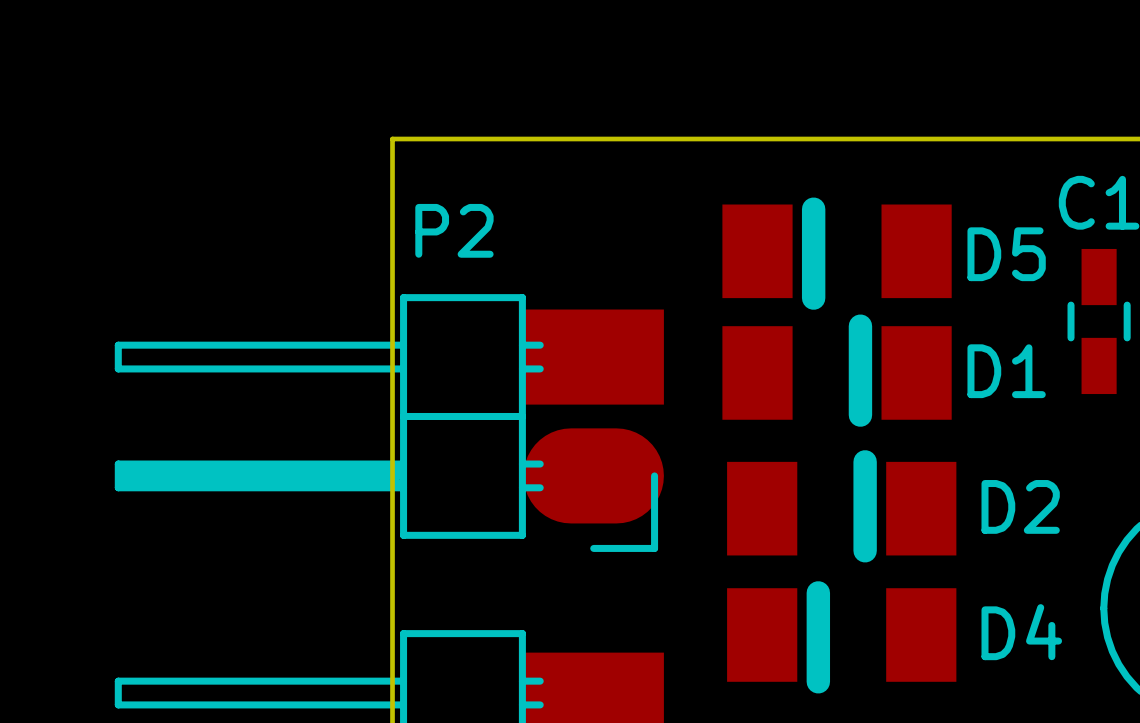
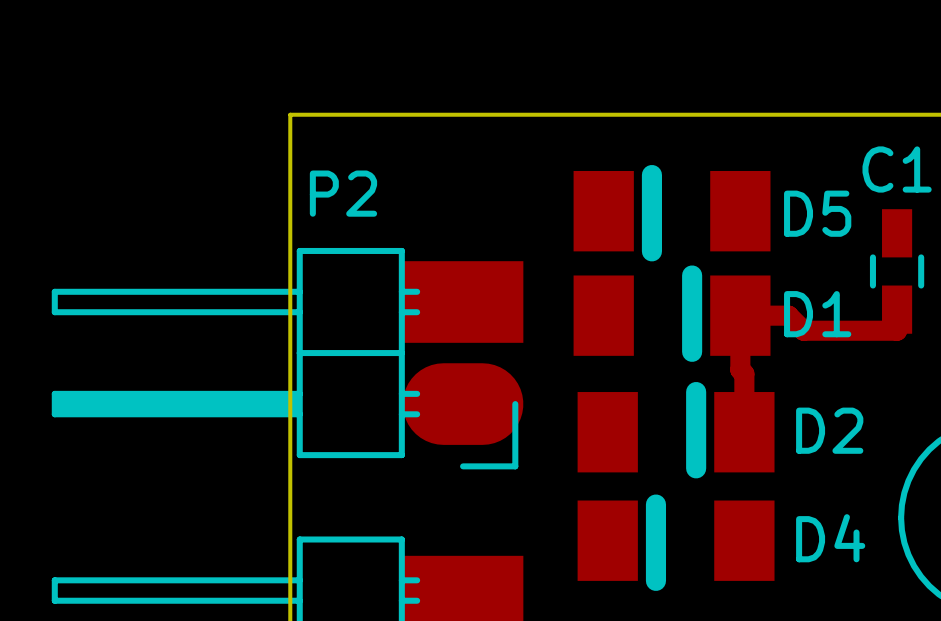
track: none -> (897, 309) (897, 330) (803, 330) (788, 315) (740, 315) (740, 369) (744, 373) (744, 432)

